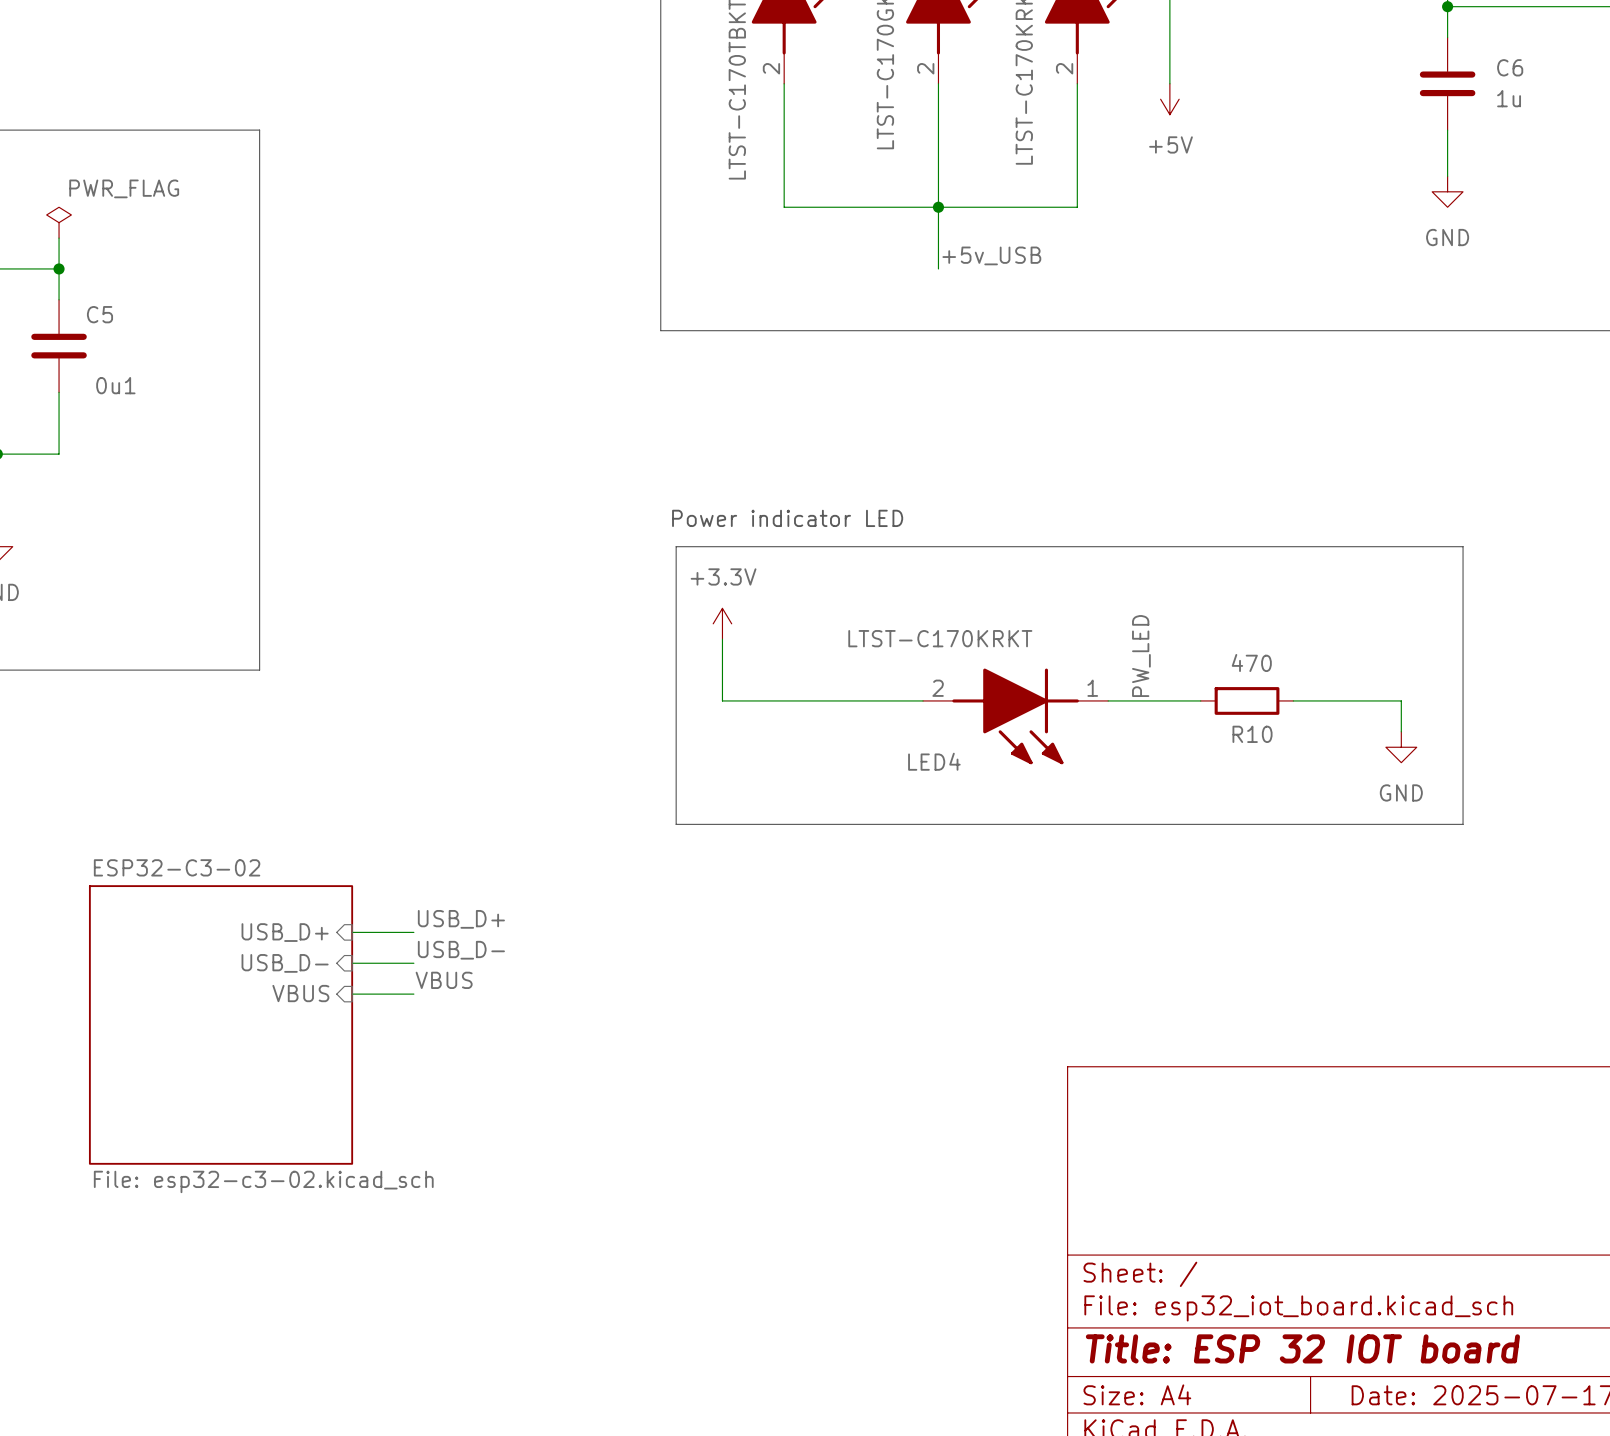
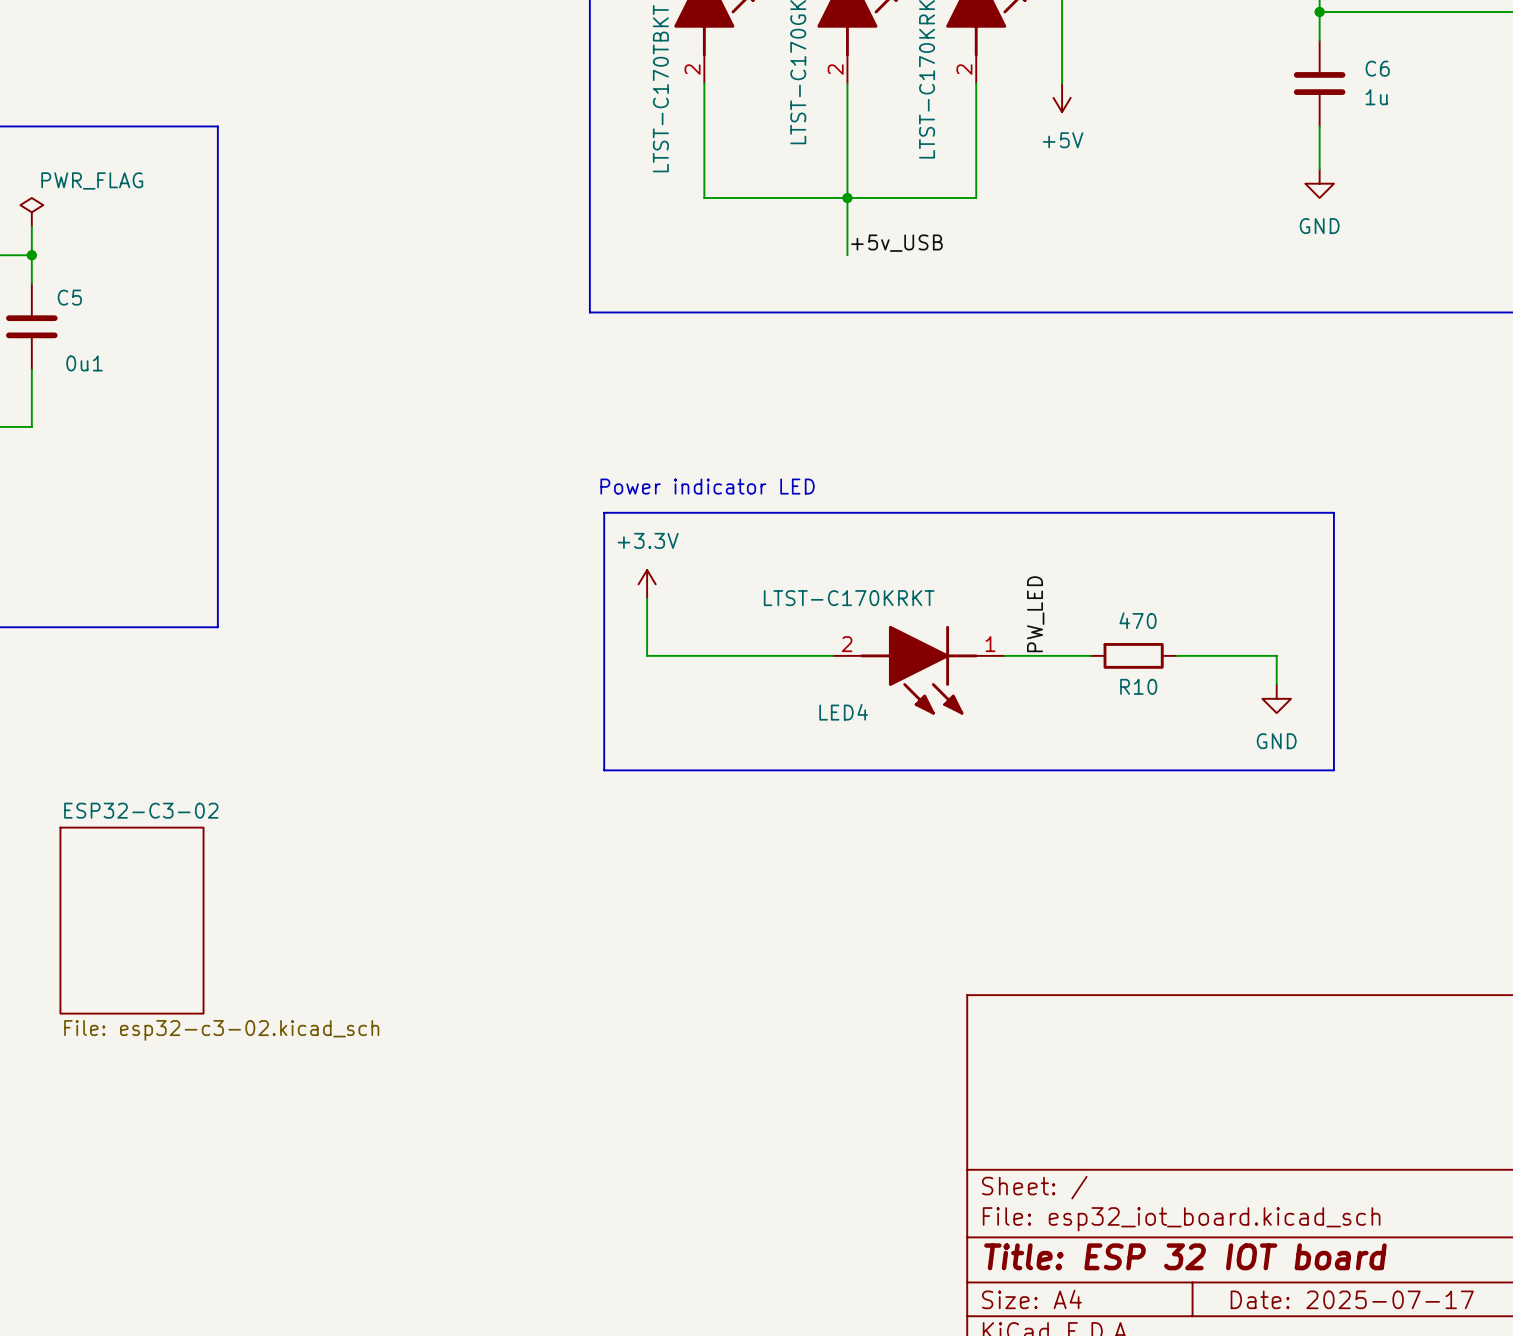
sheet ESP32-C3-02 shape: [88, 885, 354, 1165] -> [59, 826, 205, 1015]
label: USB_D+ (461, 919) -> none
sheet pin: USB_D+ (285, 932) -> none
wire: (352, 932) (413, 932) -> none
label: USB_D- (461, 950) -> none
sheet pin: USB_D- (285, 963) -> none
wire: (352, 963) (413, 963) -> none
label: VBUS (444, 980) -> none
sheet pin: VBUS (300, 993) -> none
wire: (352, 994) (413, 994) -> none
sheet ESP32-C3-02 value position: File: esp32-c3-02.kicad_sch (263, 1181) -> File: esp32-c3-02.kicad_sch (221, 1030)

